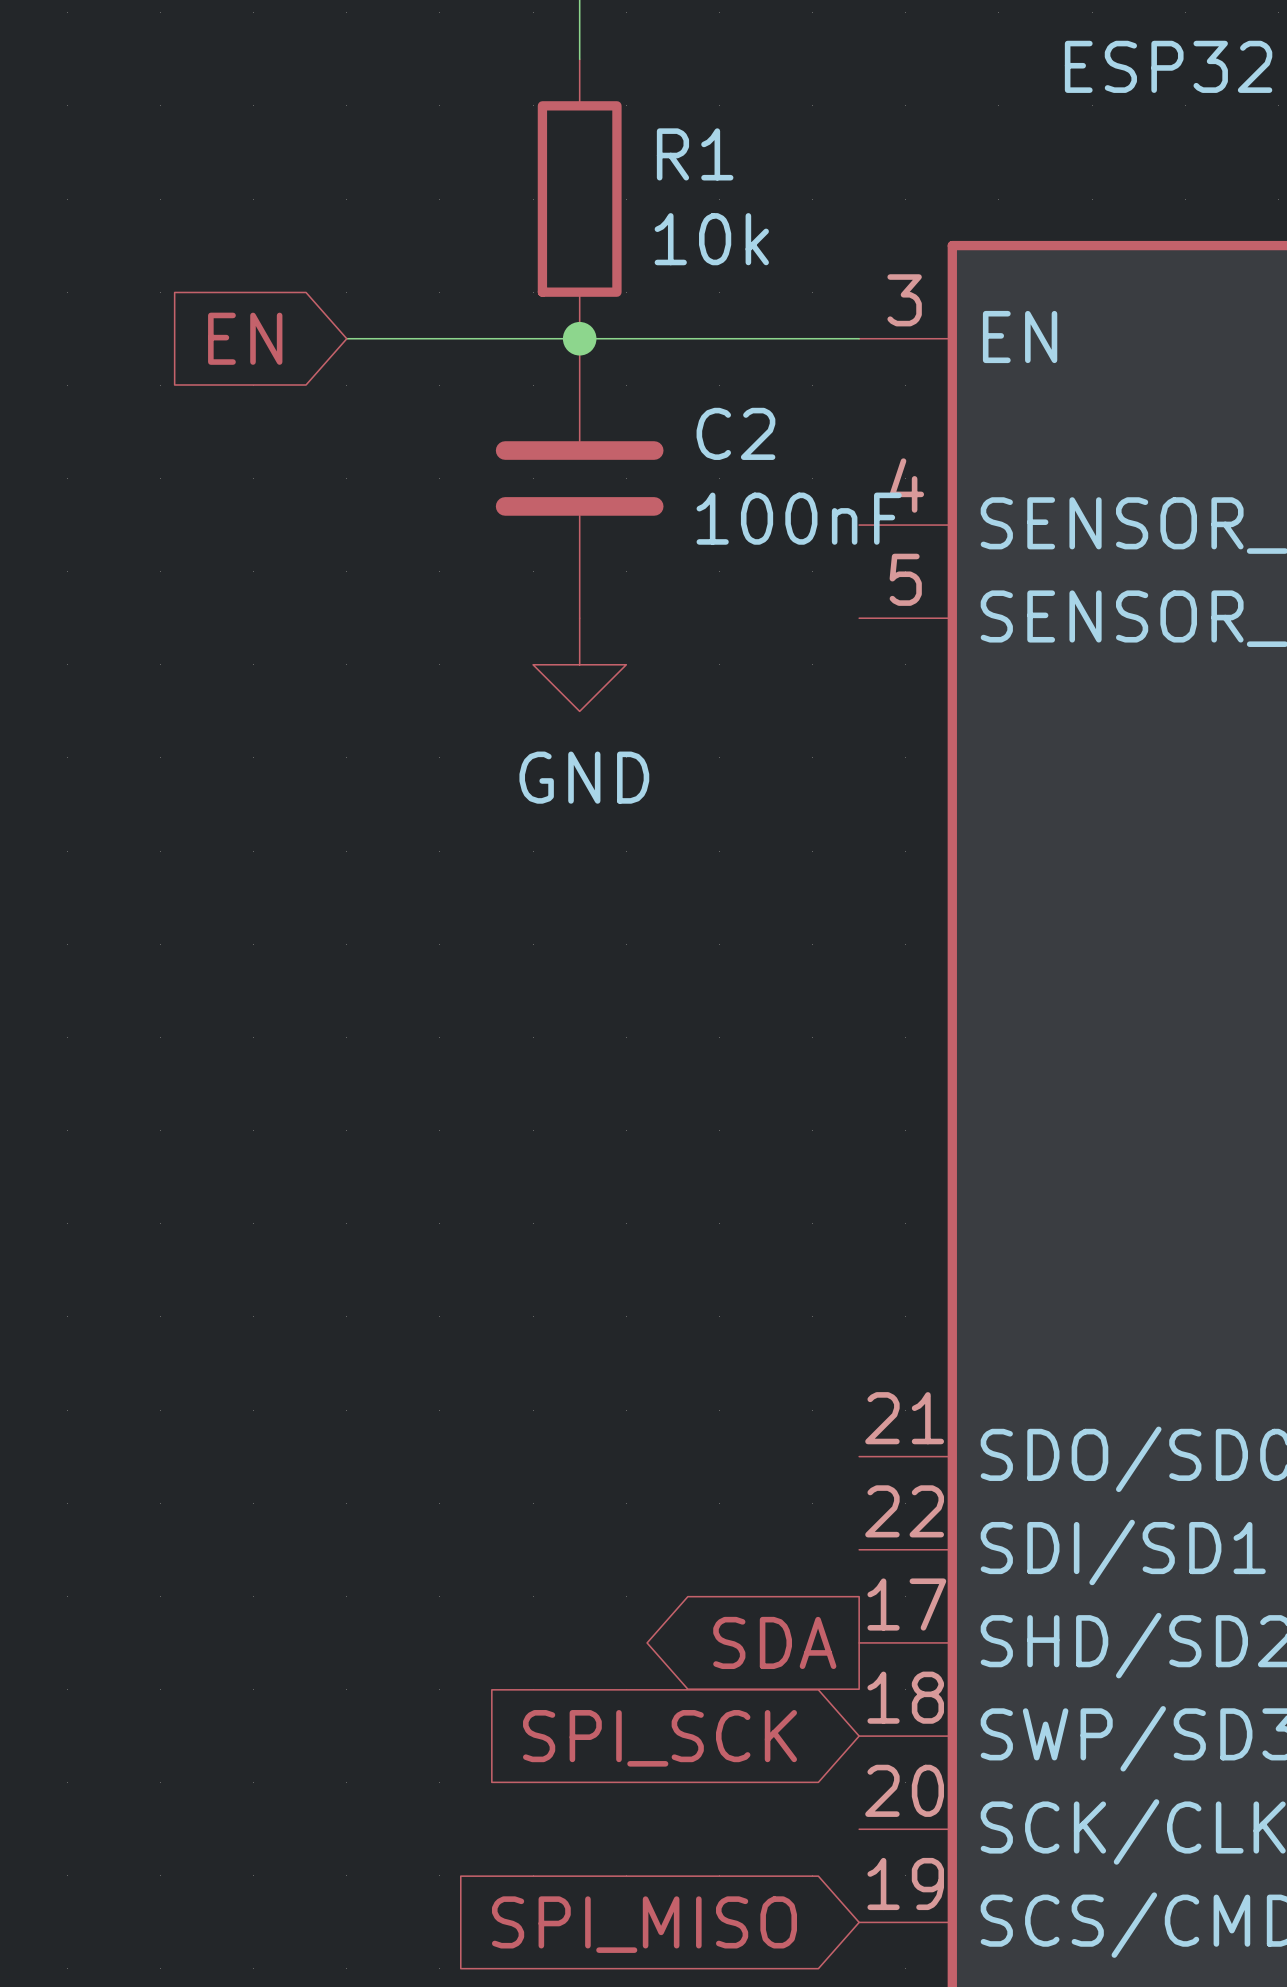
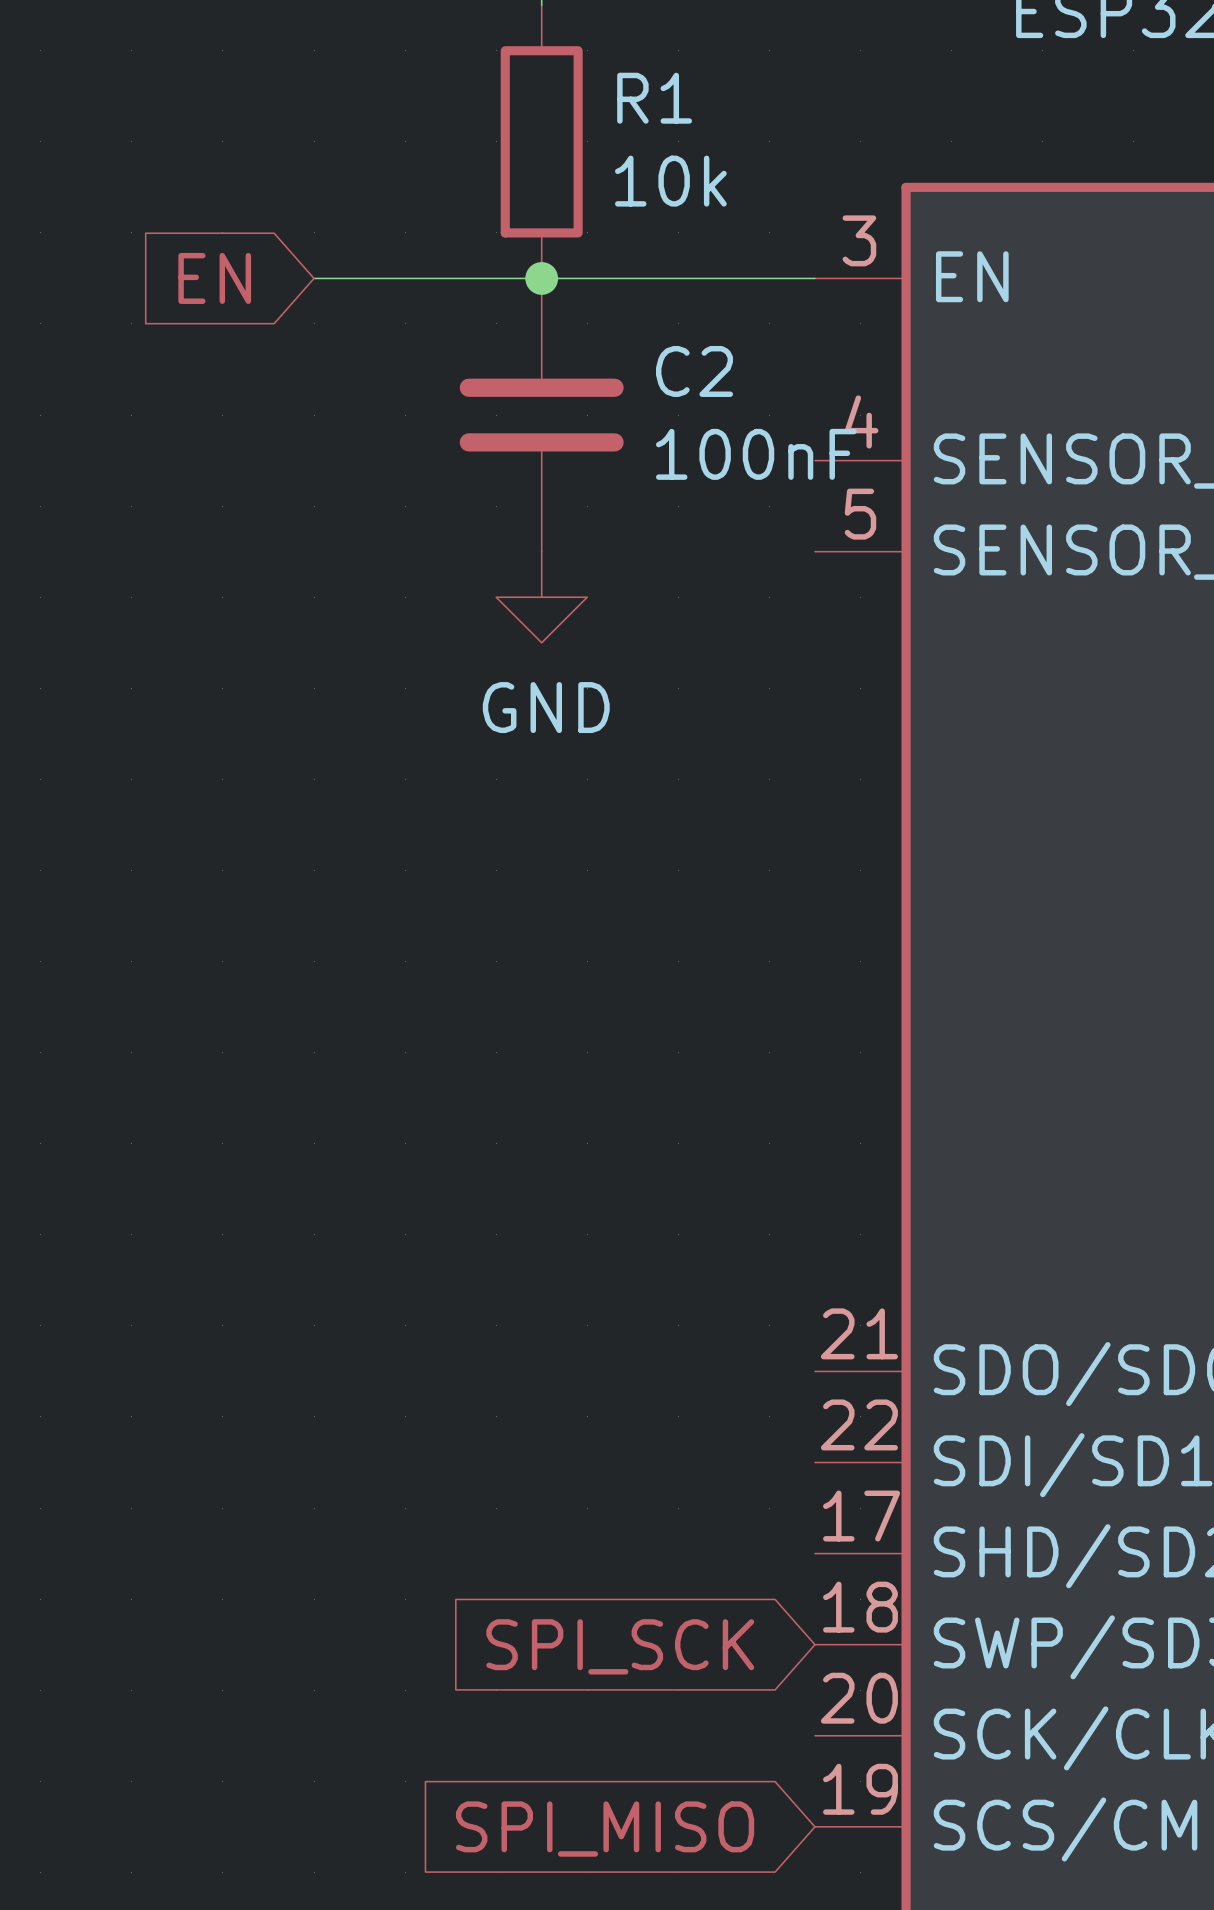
global label: SDA (774, 1642) -> none

